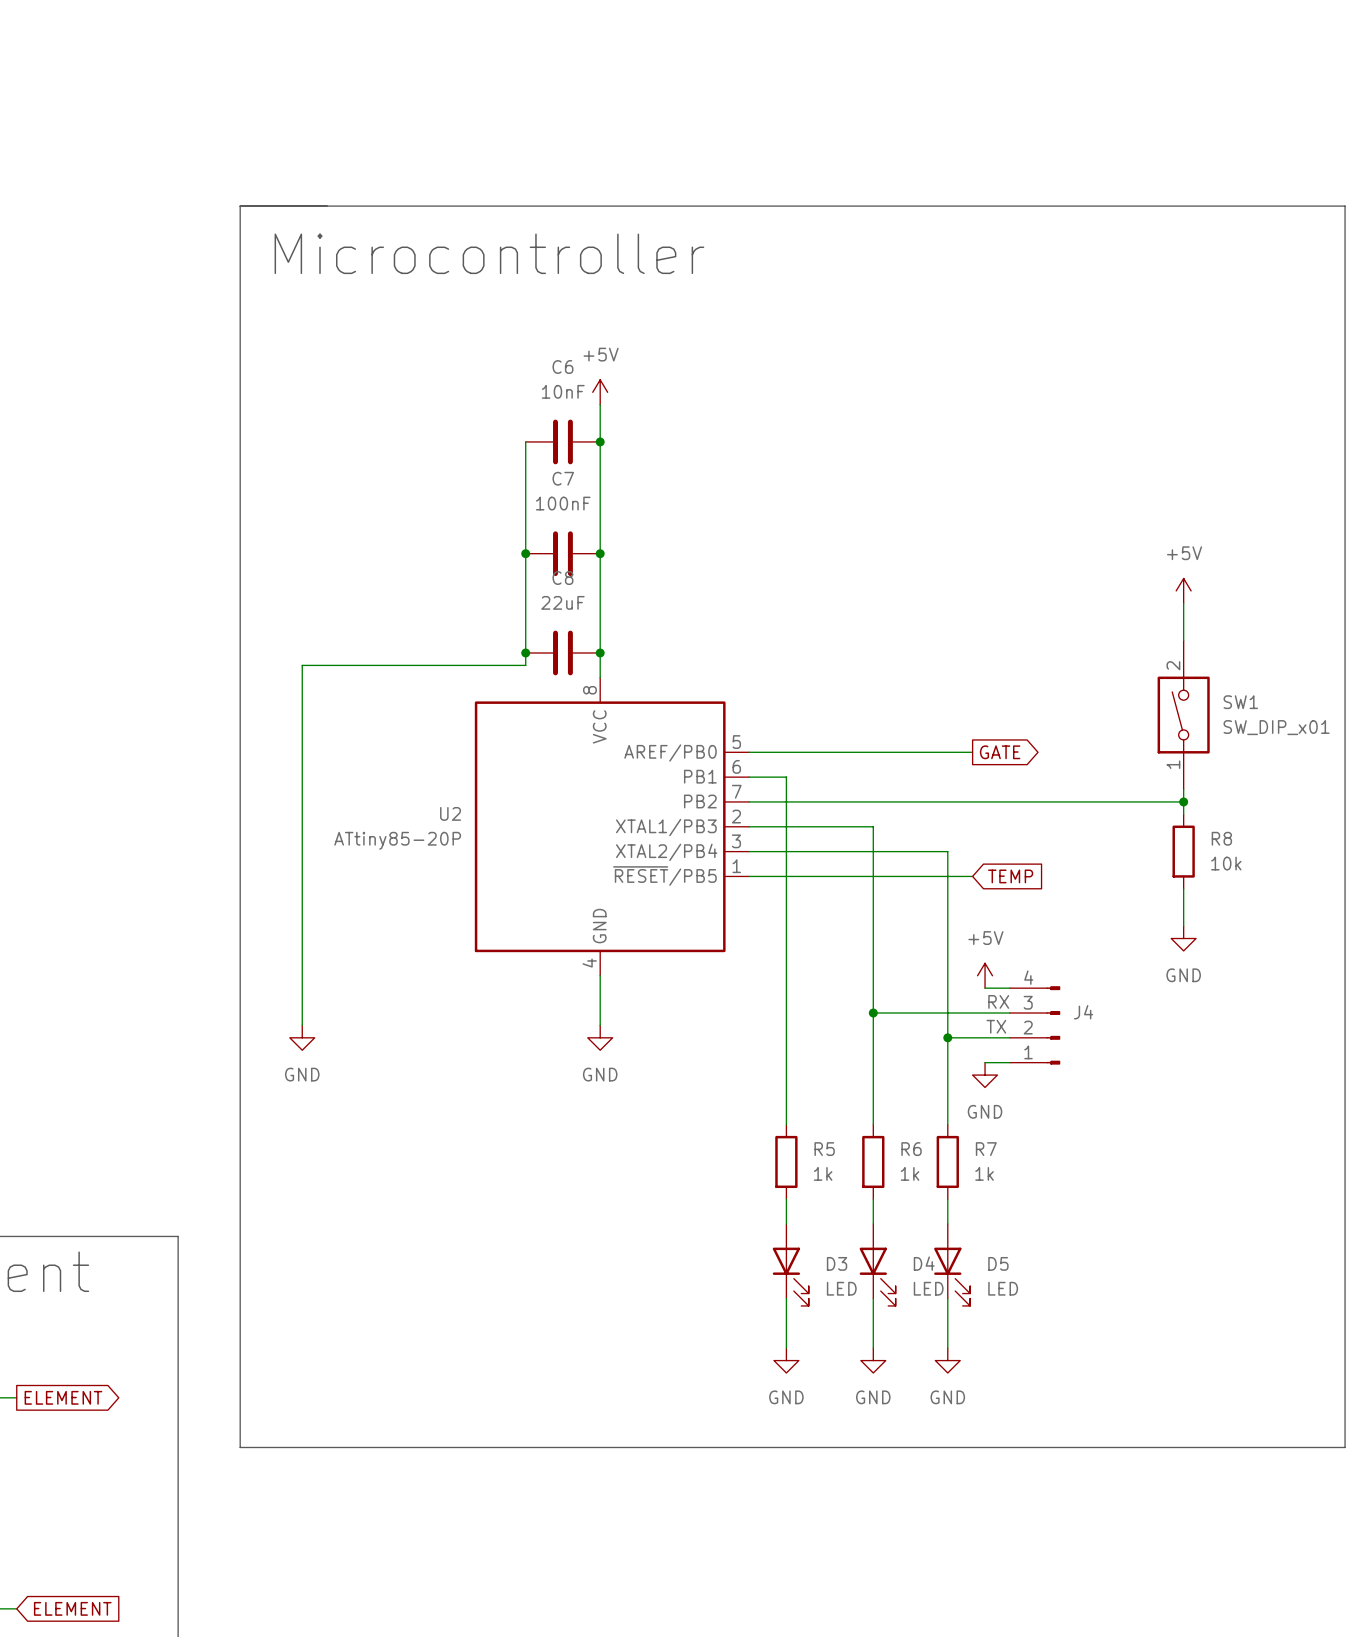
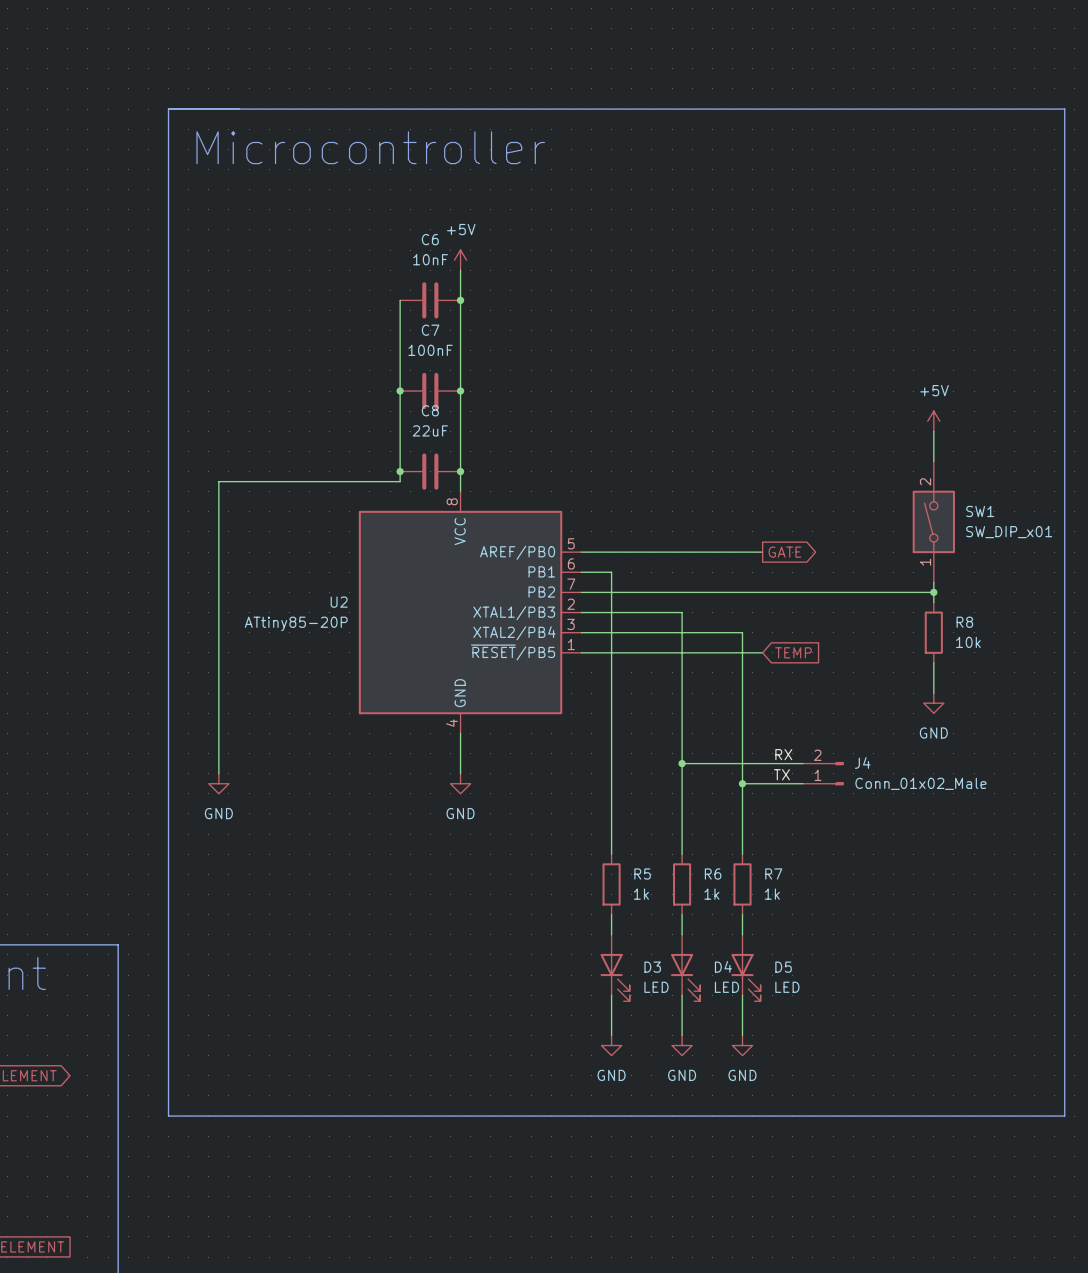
power symbol: +5V (985, 975) -> none
J4 symbol: [1009, 986, 1061, 1065] -> [802, 761, 844, 786]
wire: (985, 988) (1009, 988) -> none
J4 value: none -> Conn_01x02_Male (920, 783)
wire: (985, 1062) (1009, 1062) -> none
power symbol: GND (985, 1075) -> none

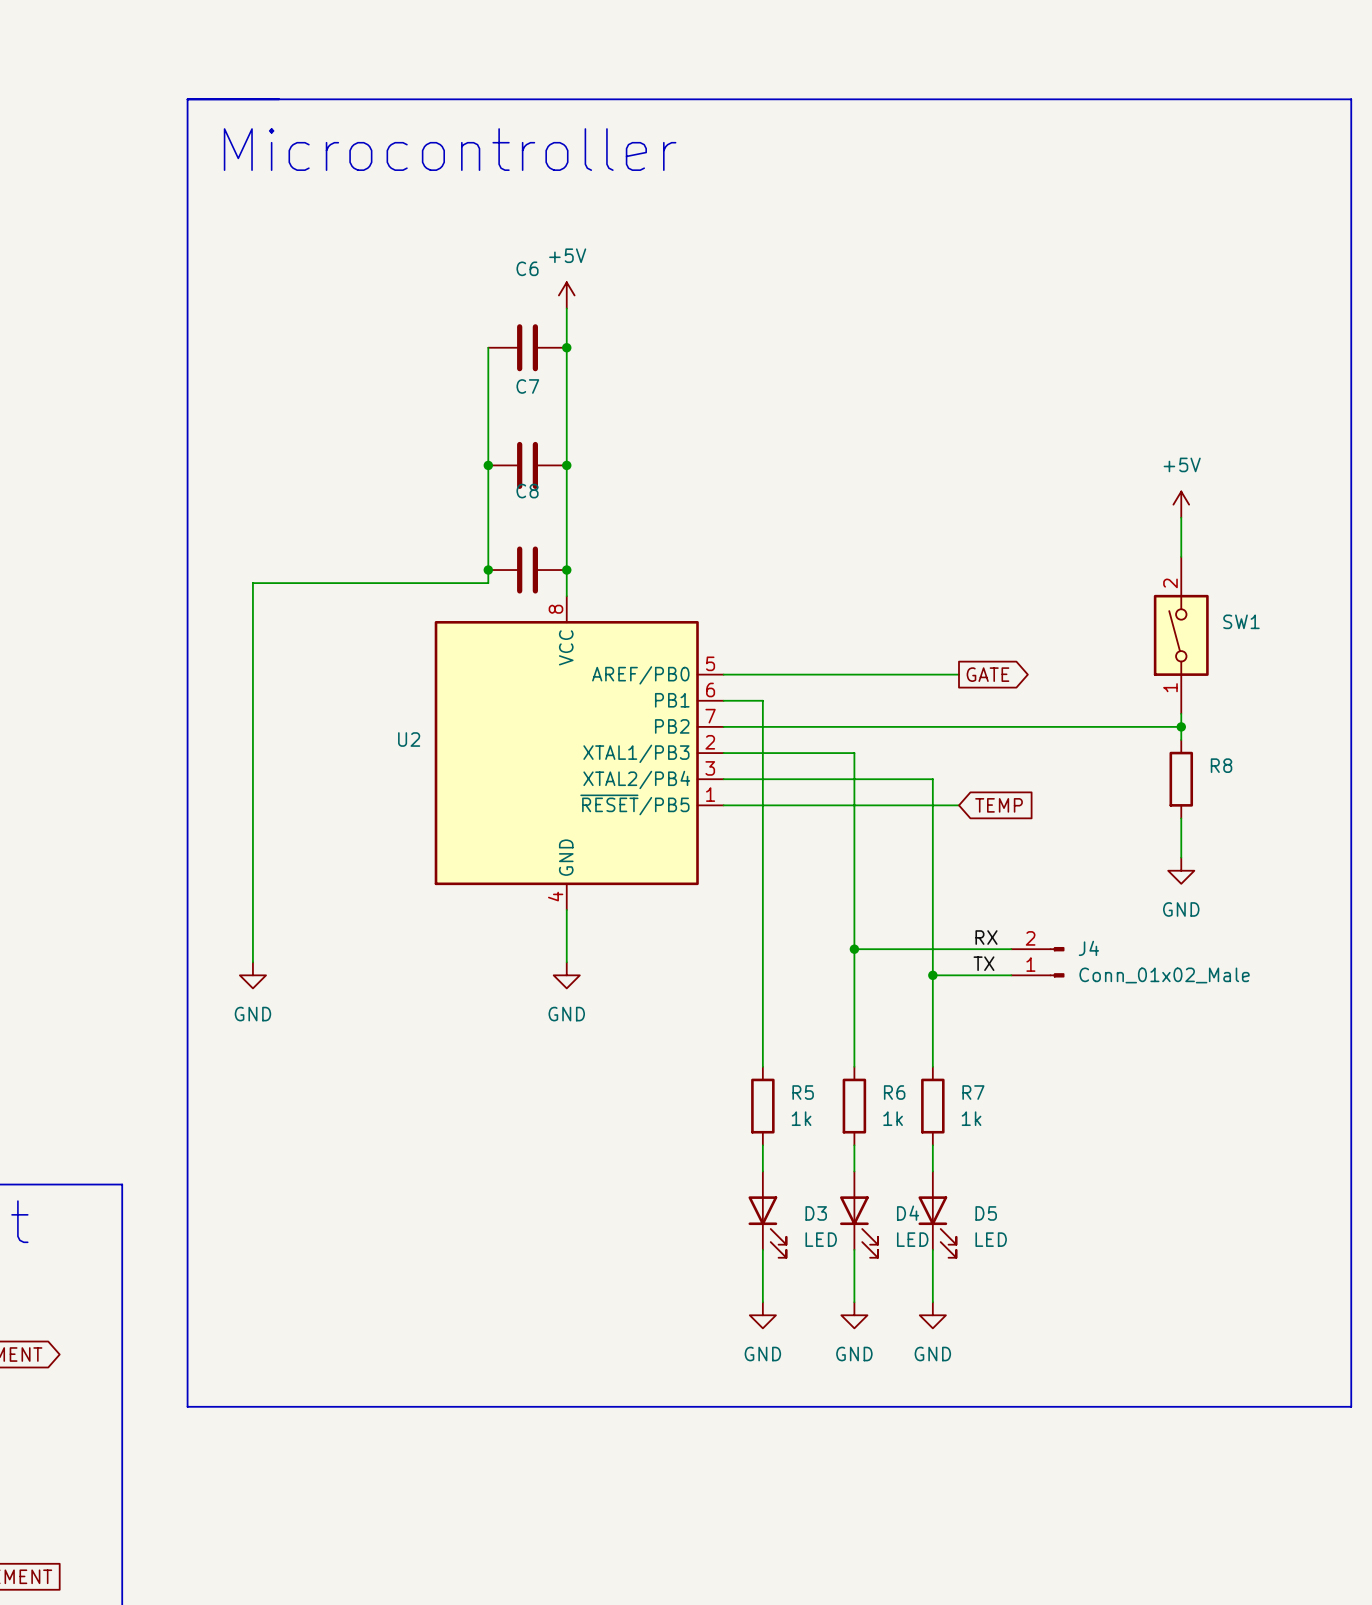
C6 value: 10nF (430, 259) -> none
C7 value: 100nF (430, 350) -> none
C8 value: 22uF (430, 430) -> none
SW1 value: SW_DIP_x01 (1009, 532) -> none
U2 value: ATtiny85-20P (296, 623) -> none
R8 value: 10k (968, 642) -> none

